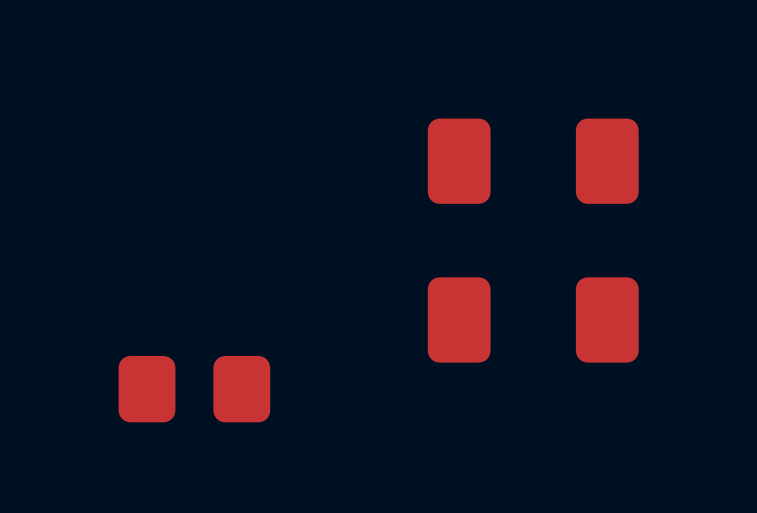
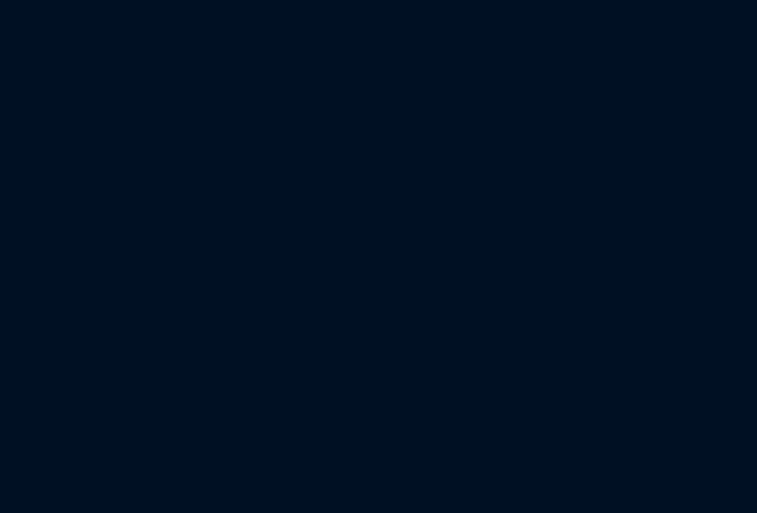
part: (533, 161) -> none
part: (533, 319) -> none
part: (194, 389) -> none

